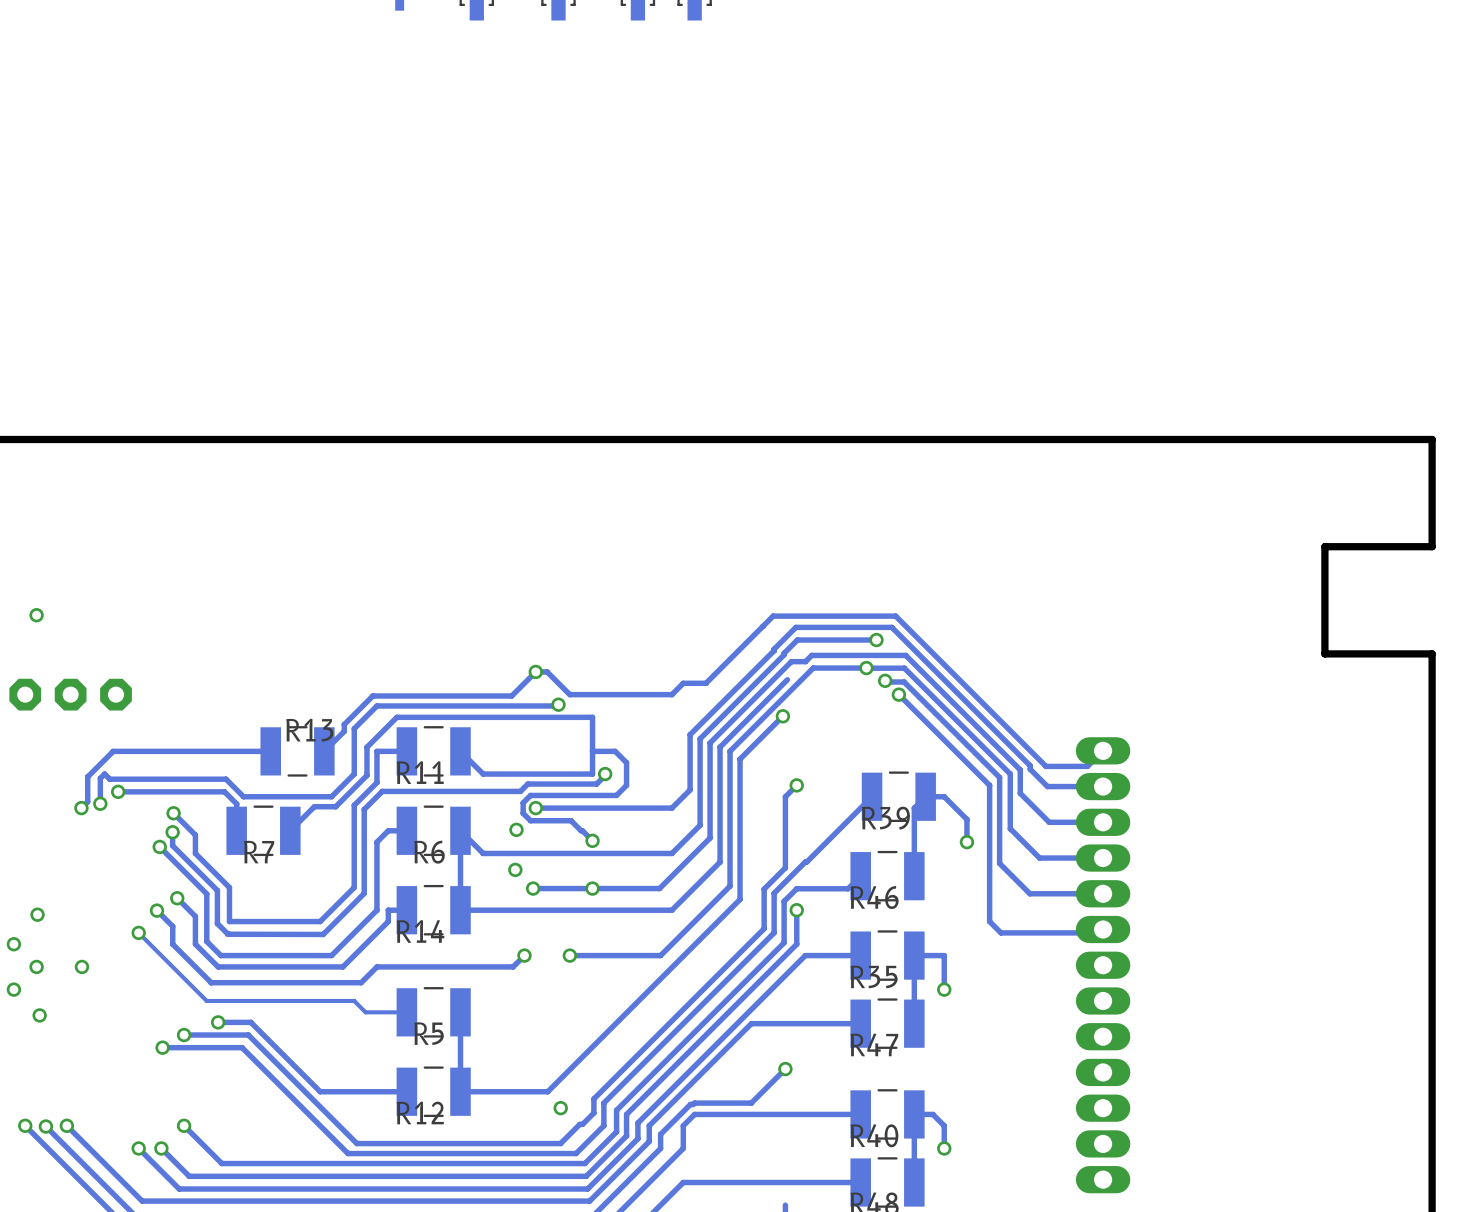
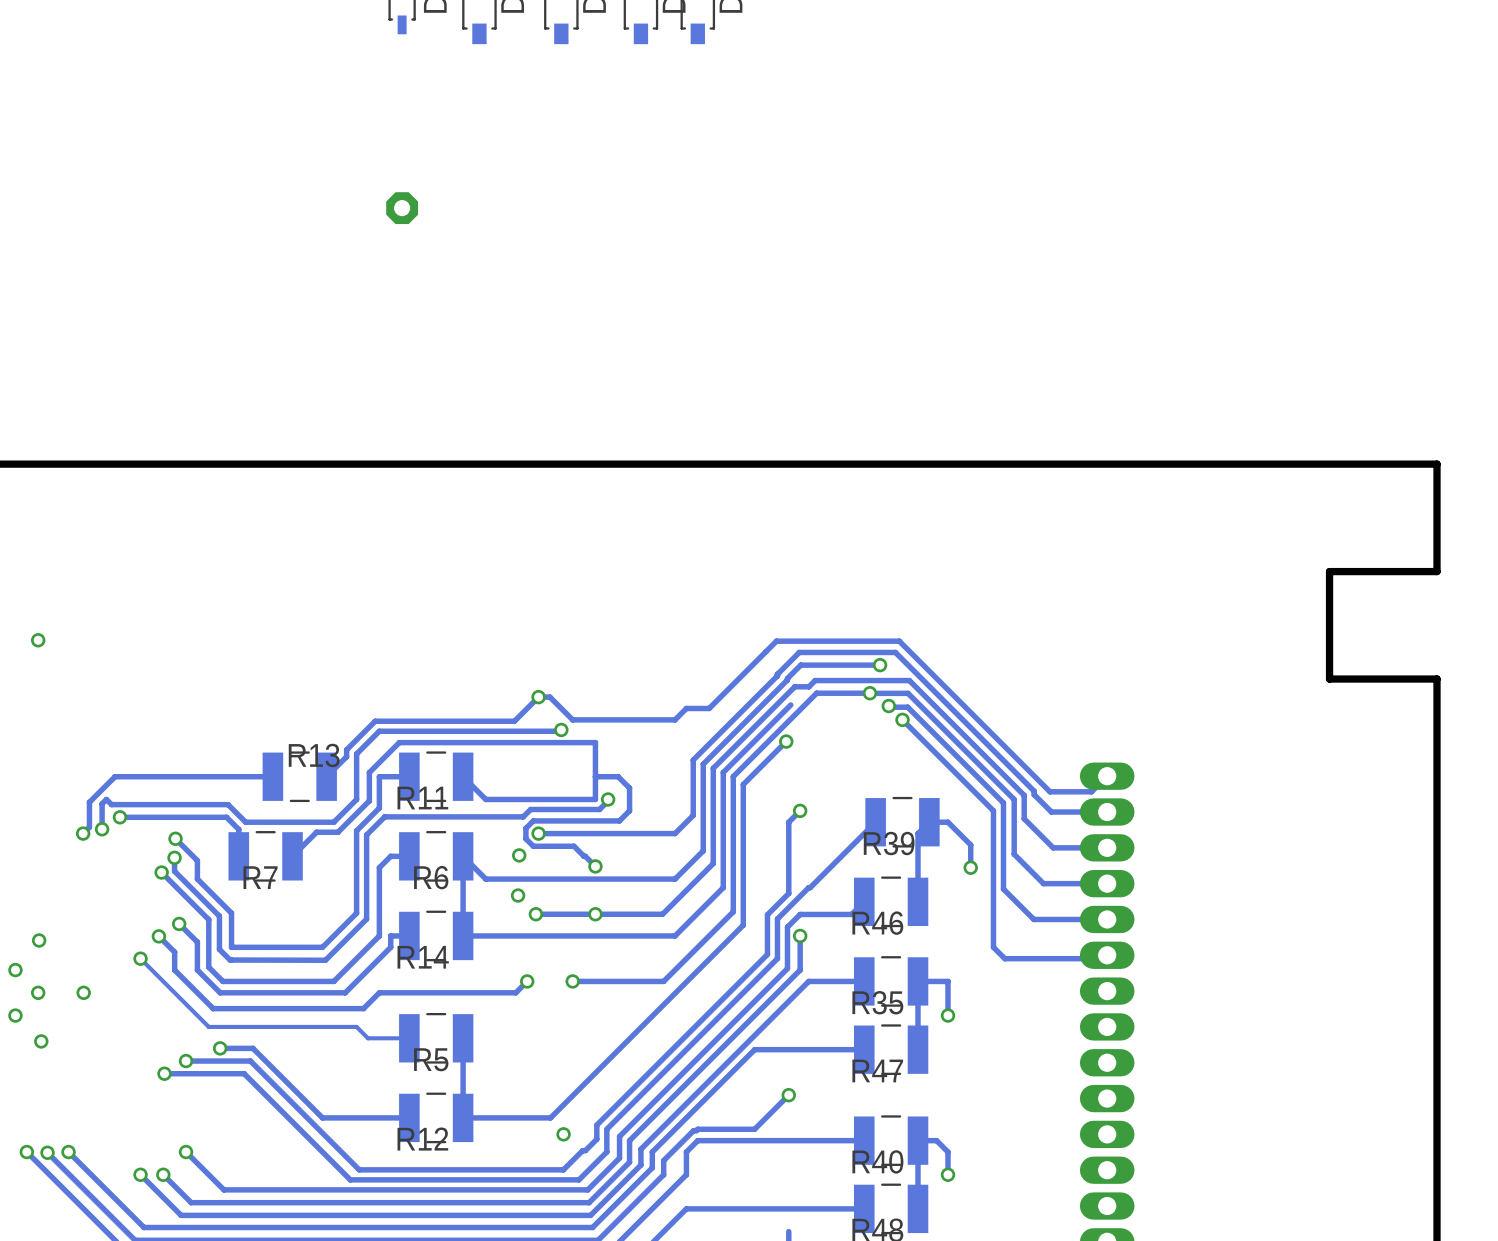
part: none -> (402, 208)
part: (25, 694) -> none
part: (70, 694) -> none
part: (116, 694) -> none

